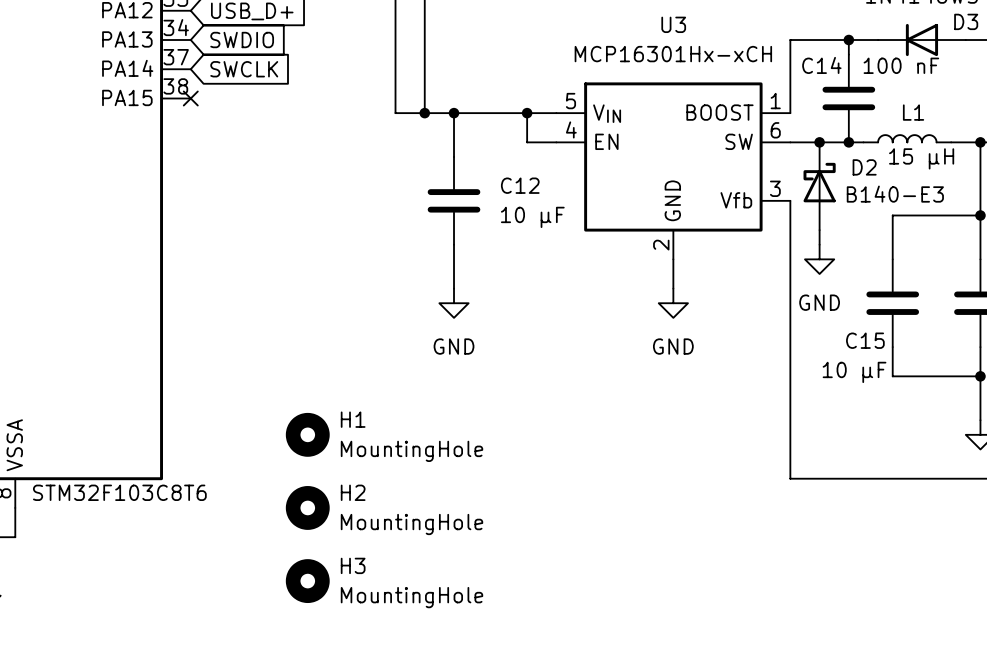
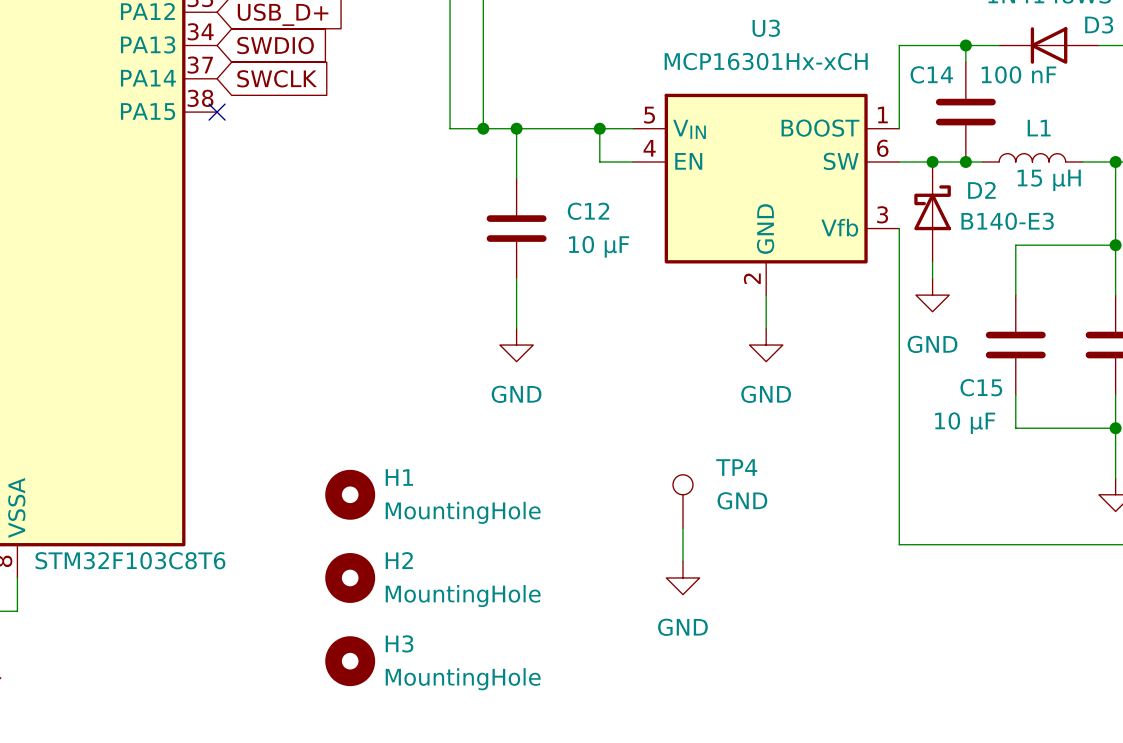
TP4: none -> GND (682, 501)
wire: none -> (682, 528) (682, 561)
power symbol: none -> GND (682, 577)

